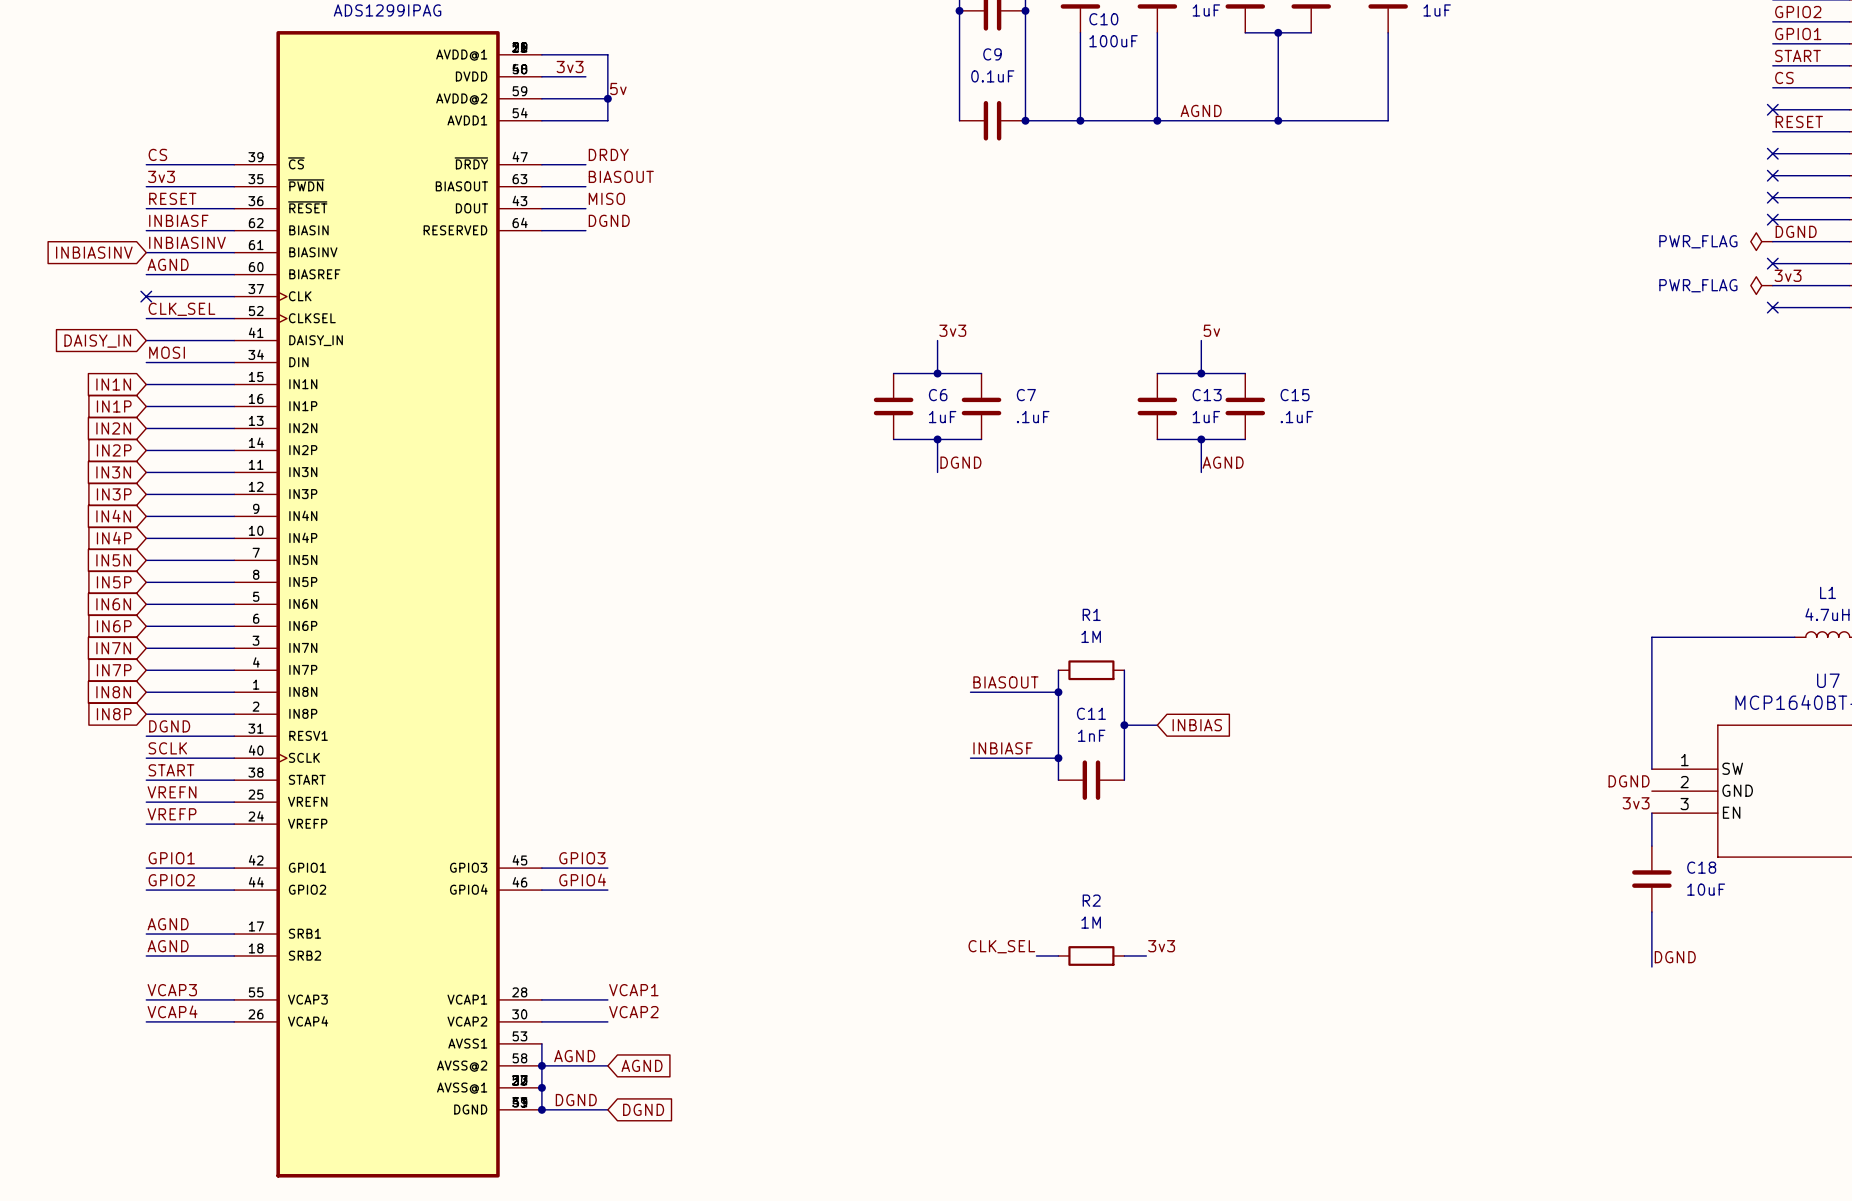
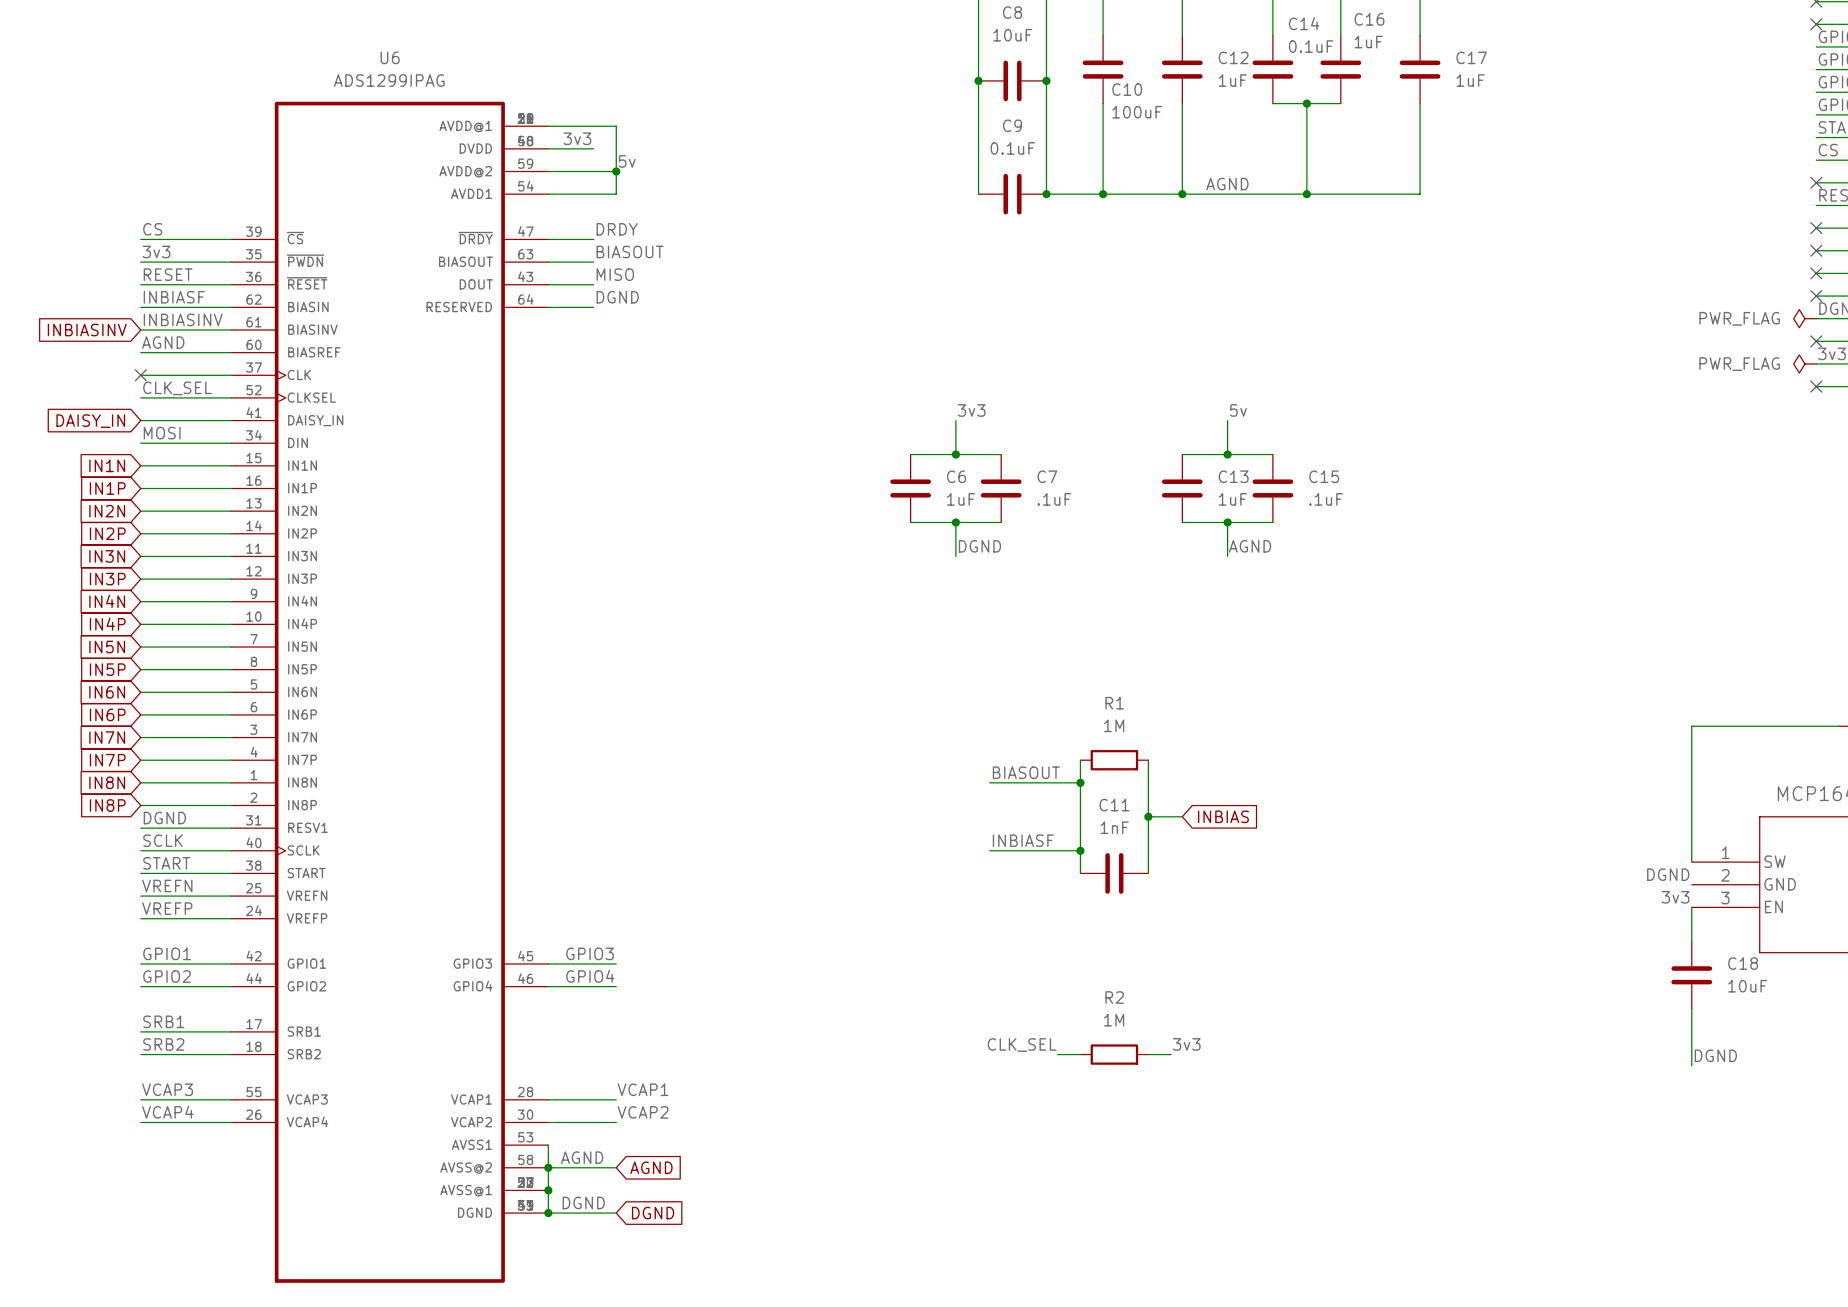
label: AGND (168, 924) -> SRB1 (163, 1021)
label: AGND (168, 946) -> SRB2 (163, 1044)

